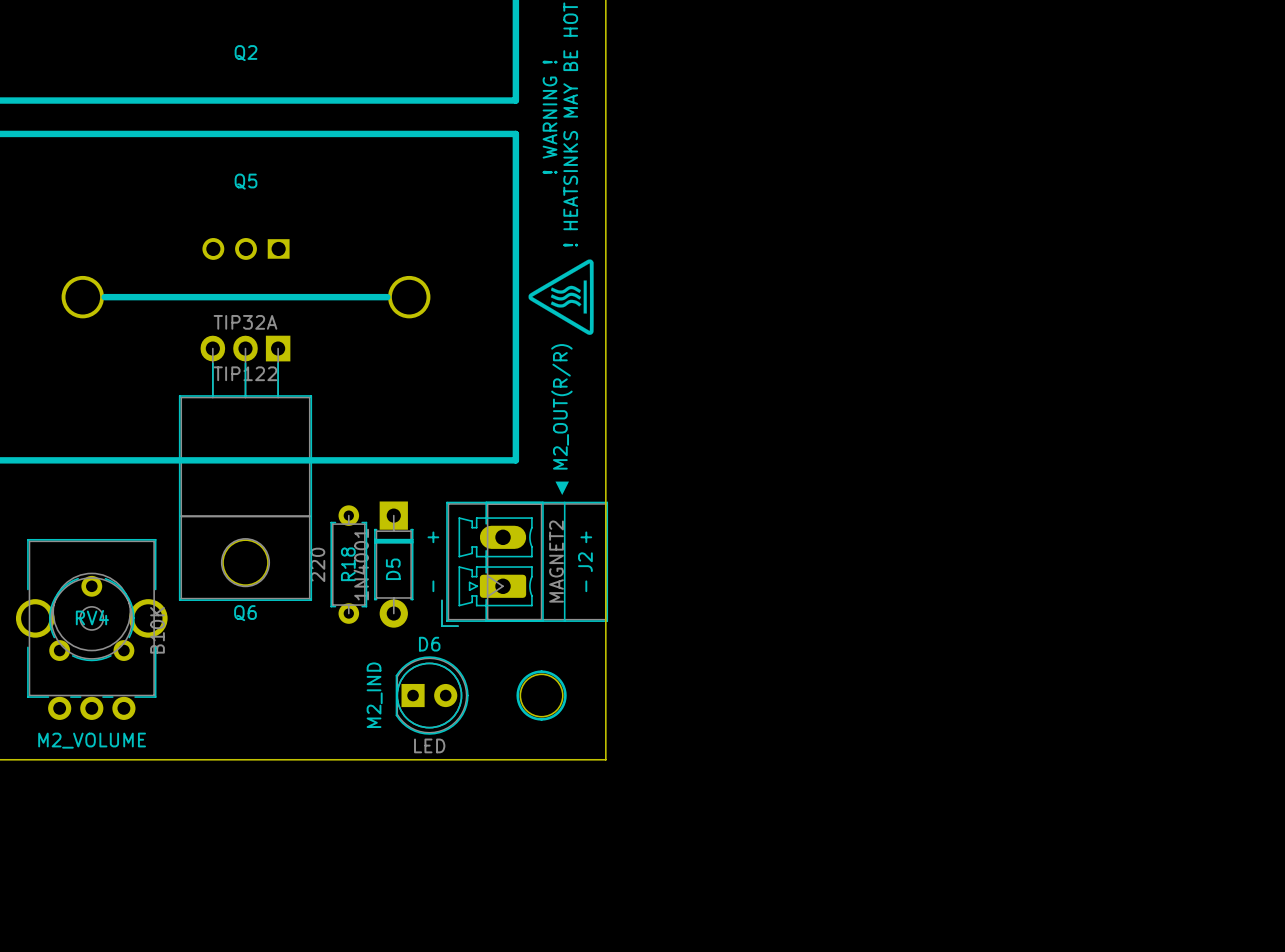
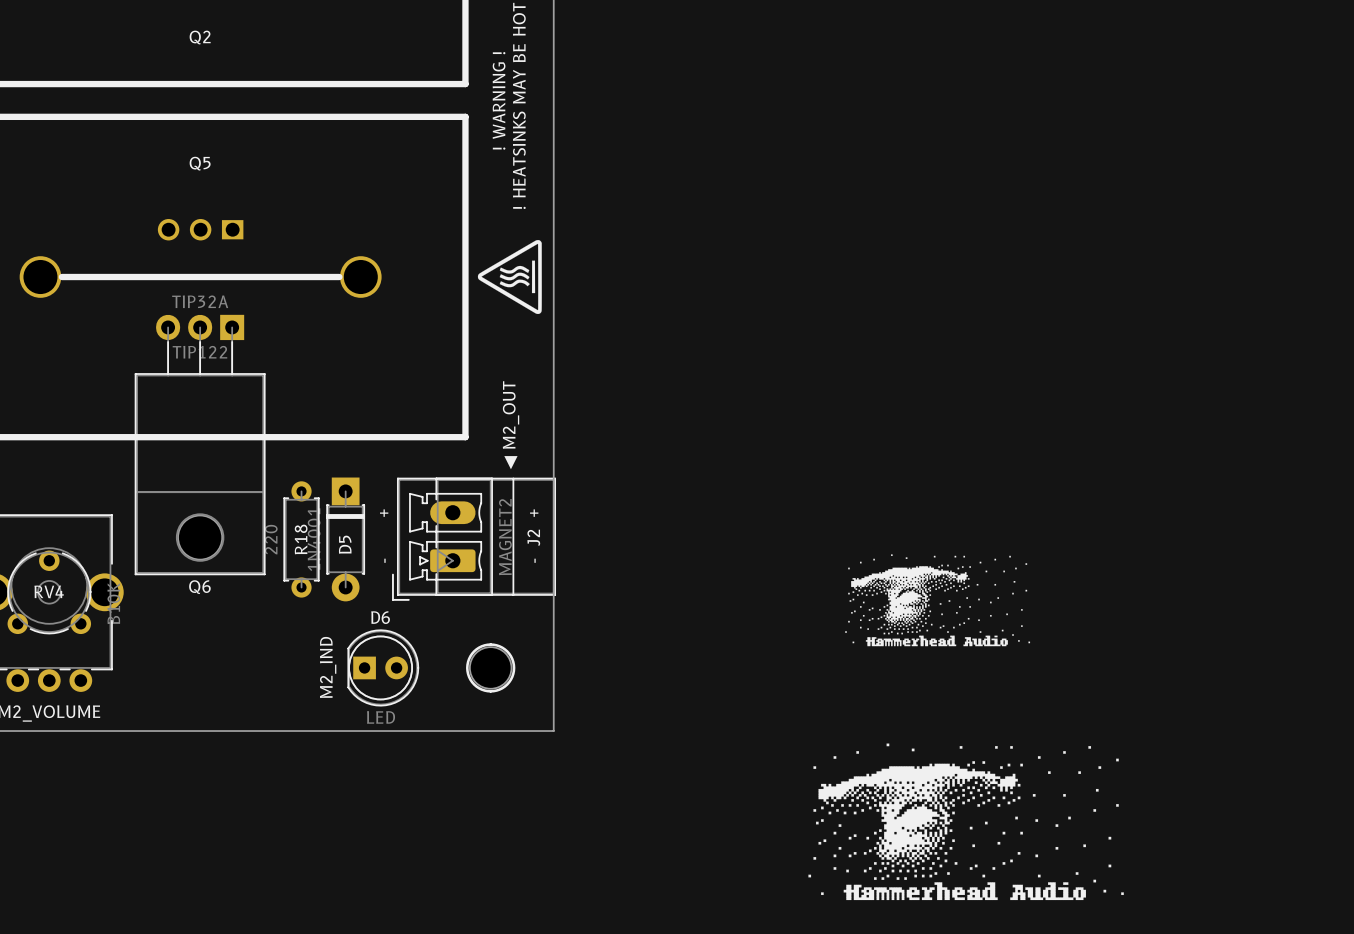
text: ◀ M2_OUT(R/R) (561, 420) -> ◀ M2_OUT (511, 425)
drawing: none -> [845, 554, 1031, 647]
drawing: none -> [808, 743, 1124, 901]

